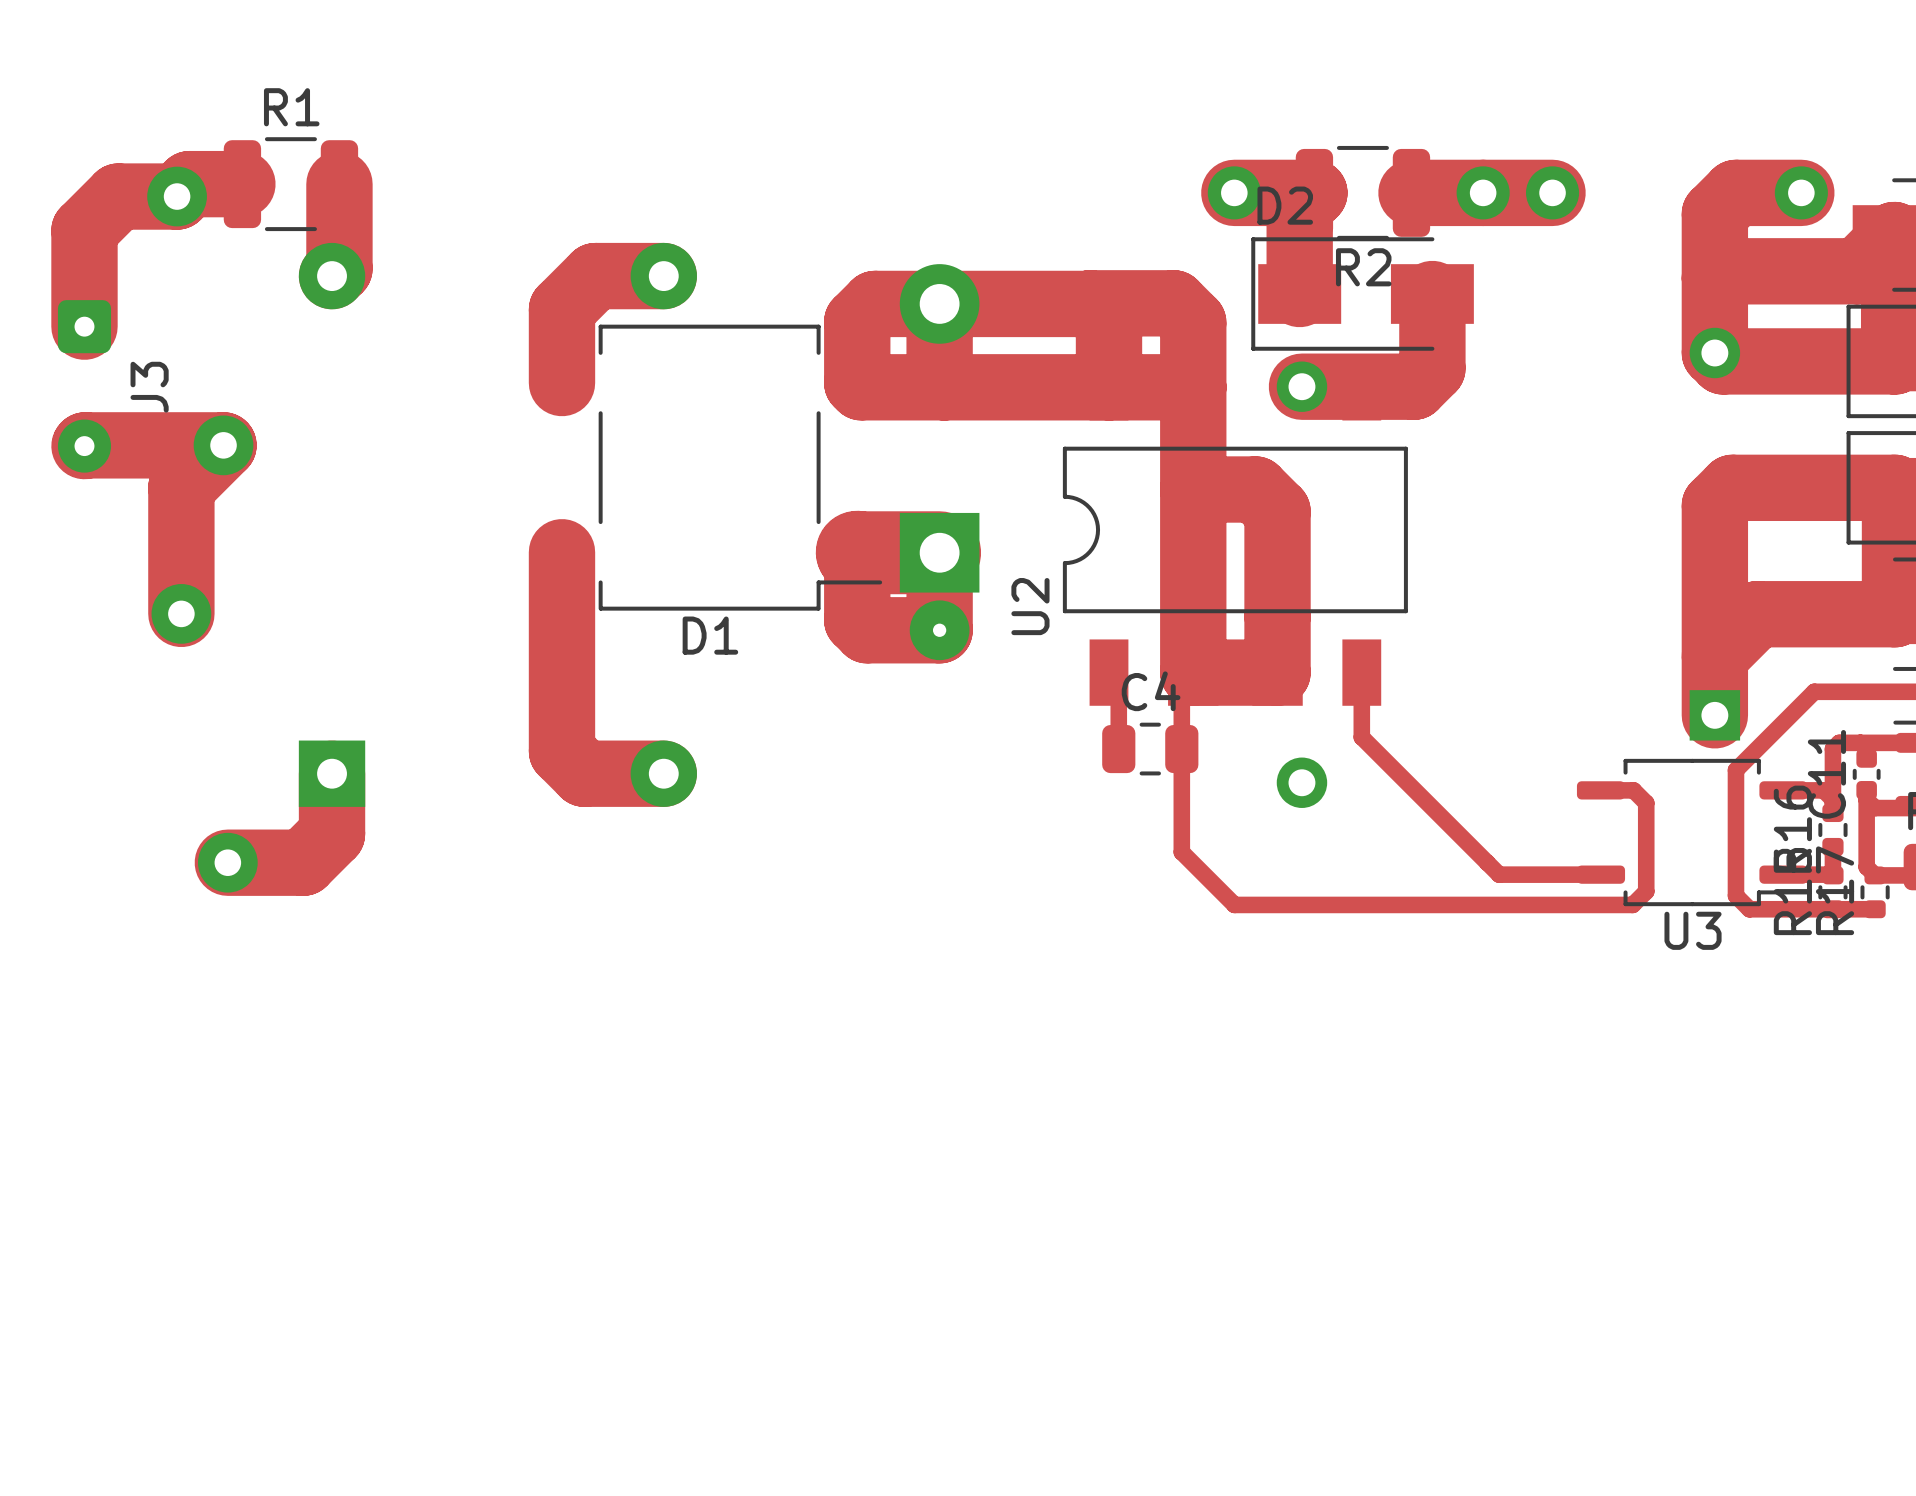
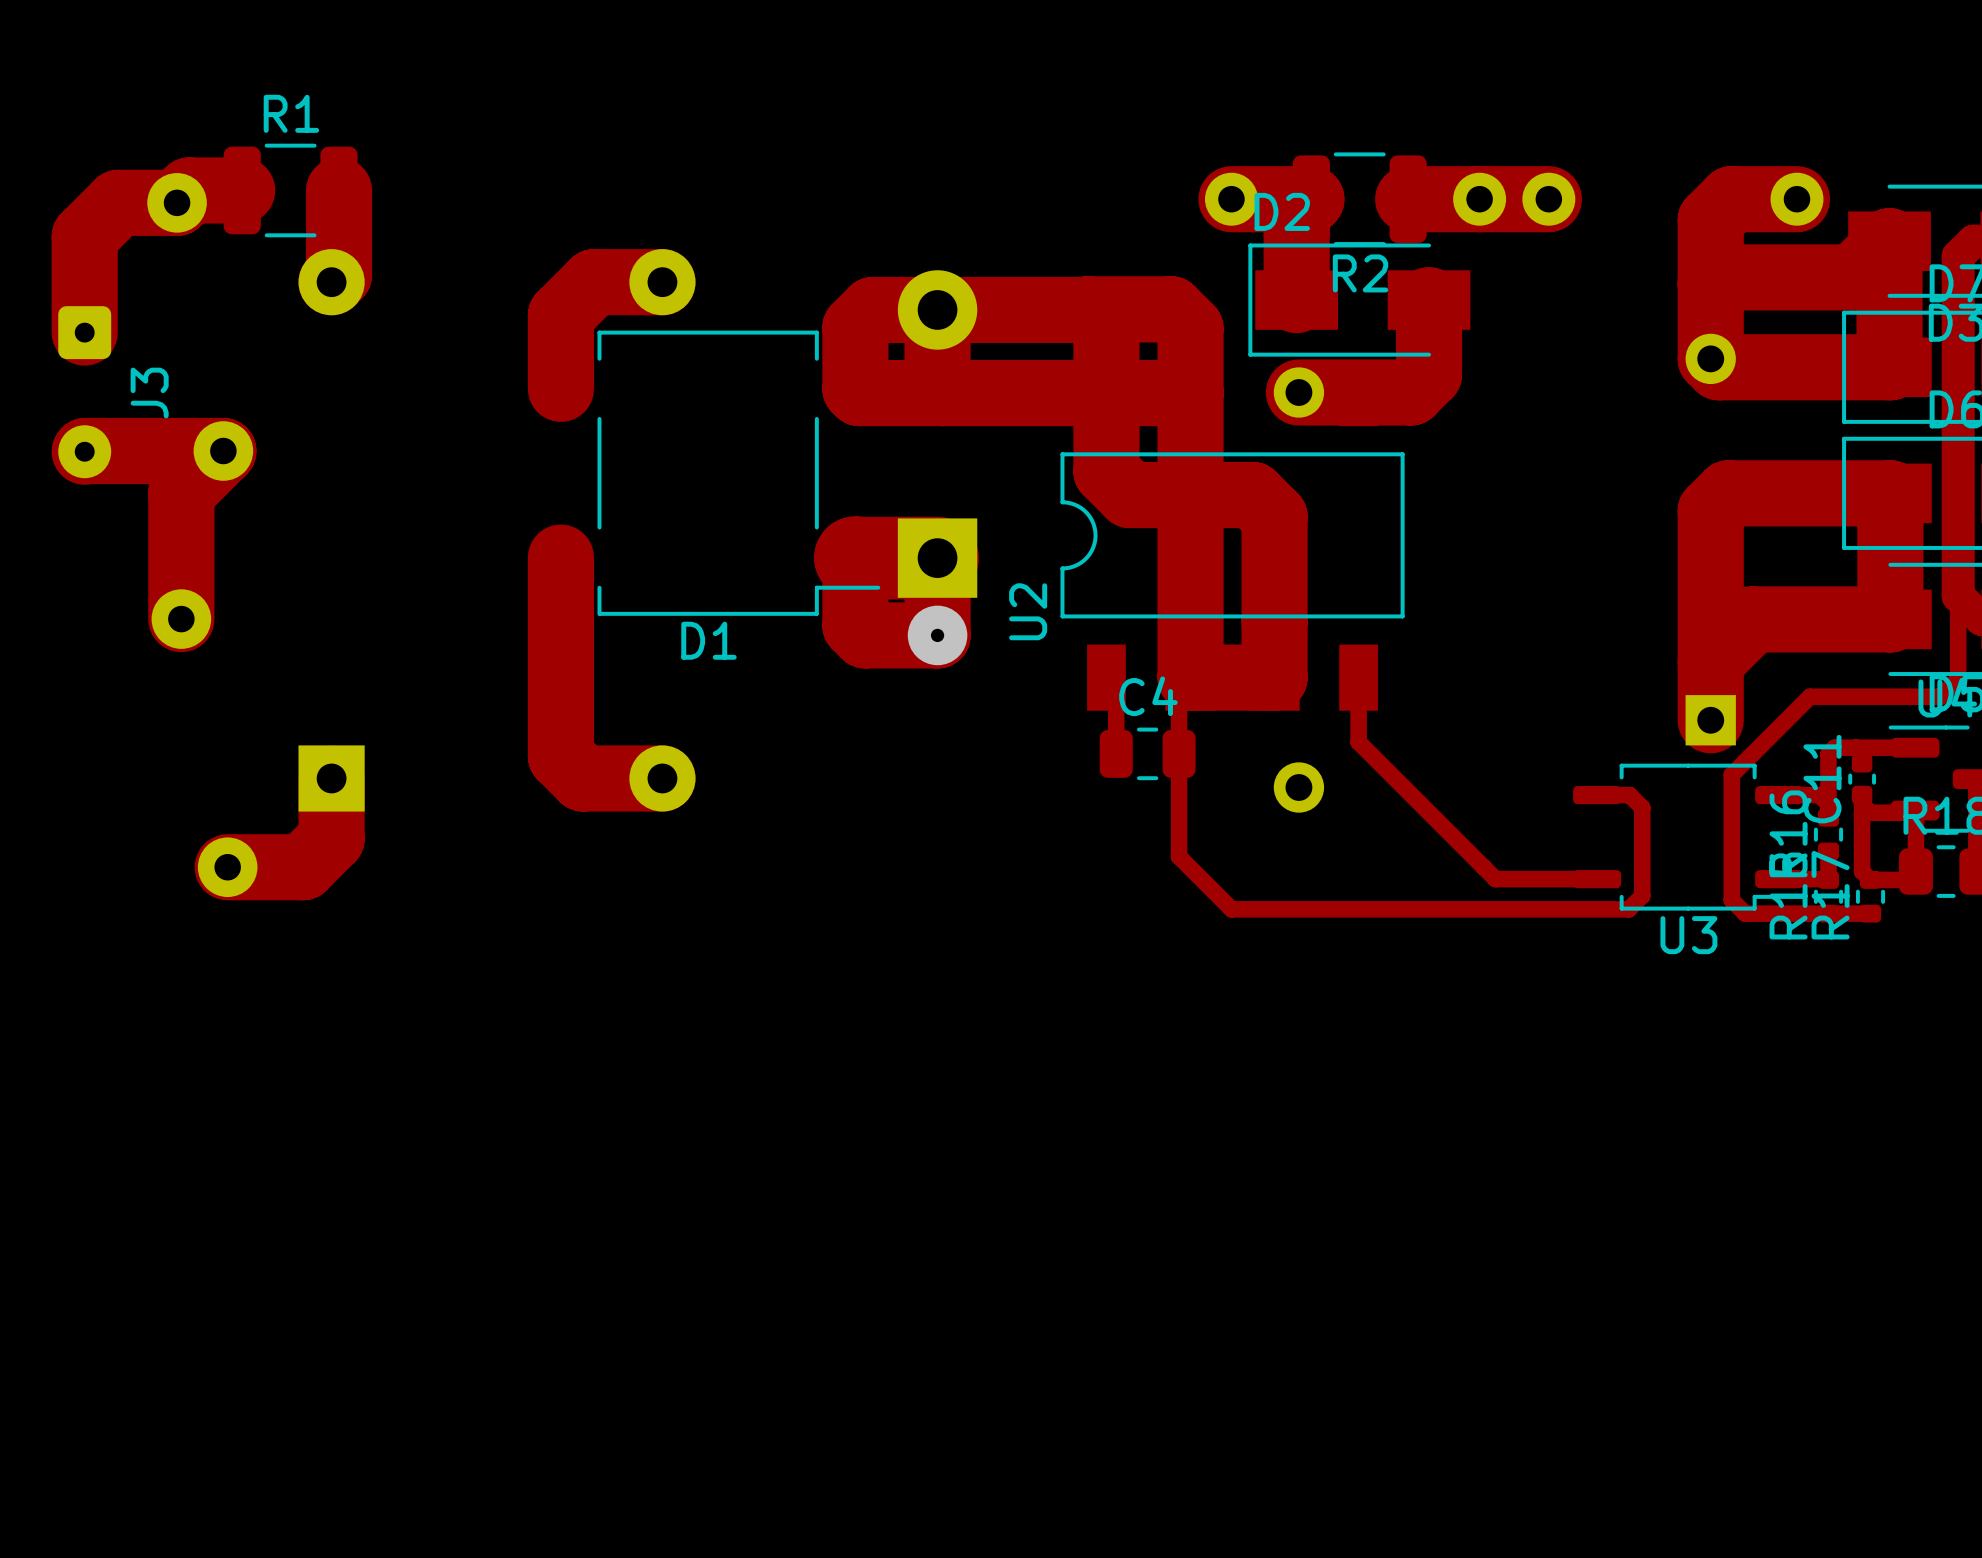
track: none -> (1106, 393) (1106, 471) (1130, 495) (1190, 495)

